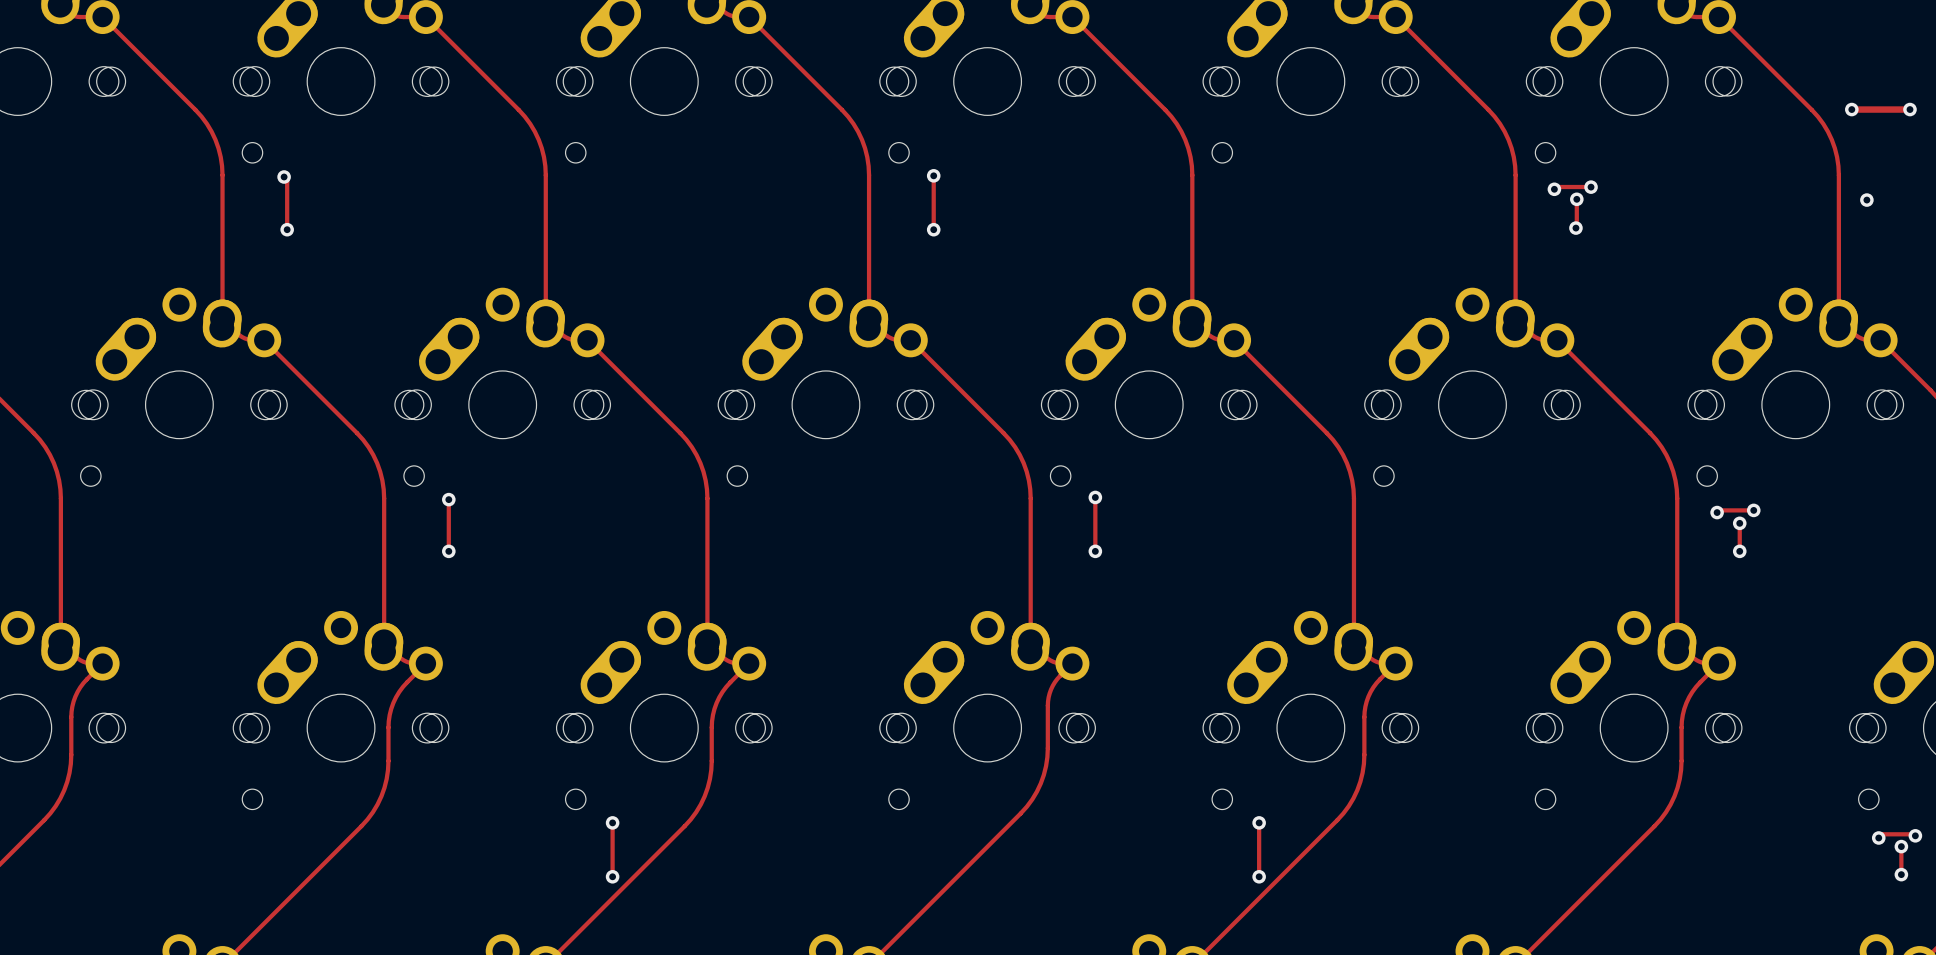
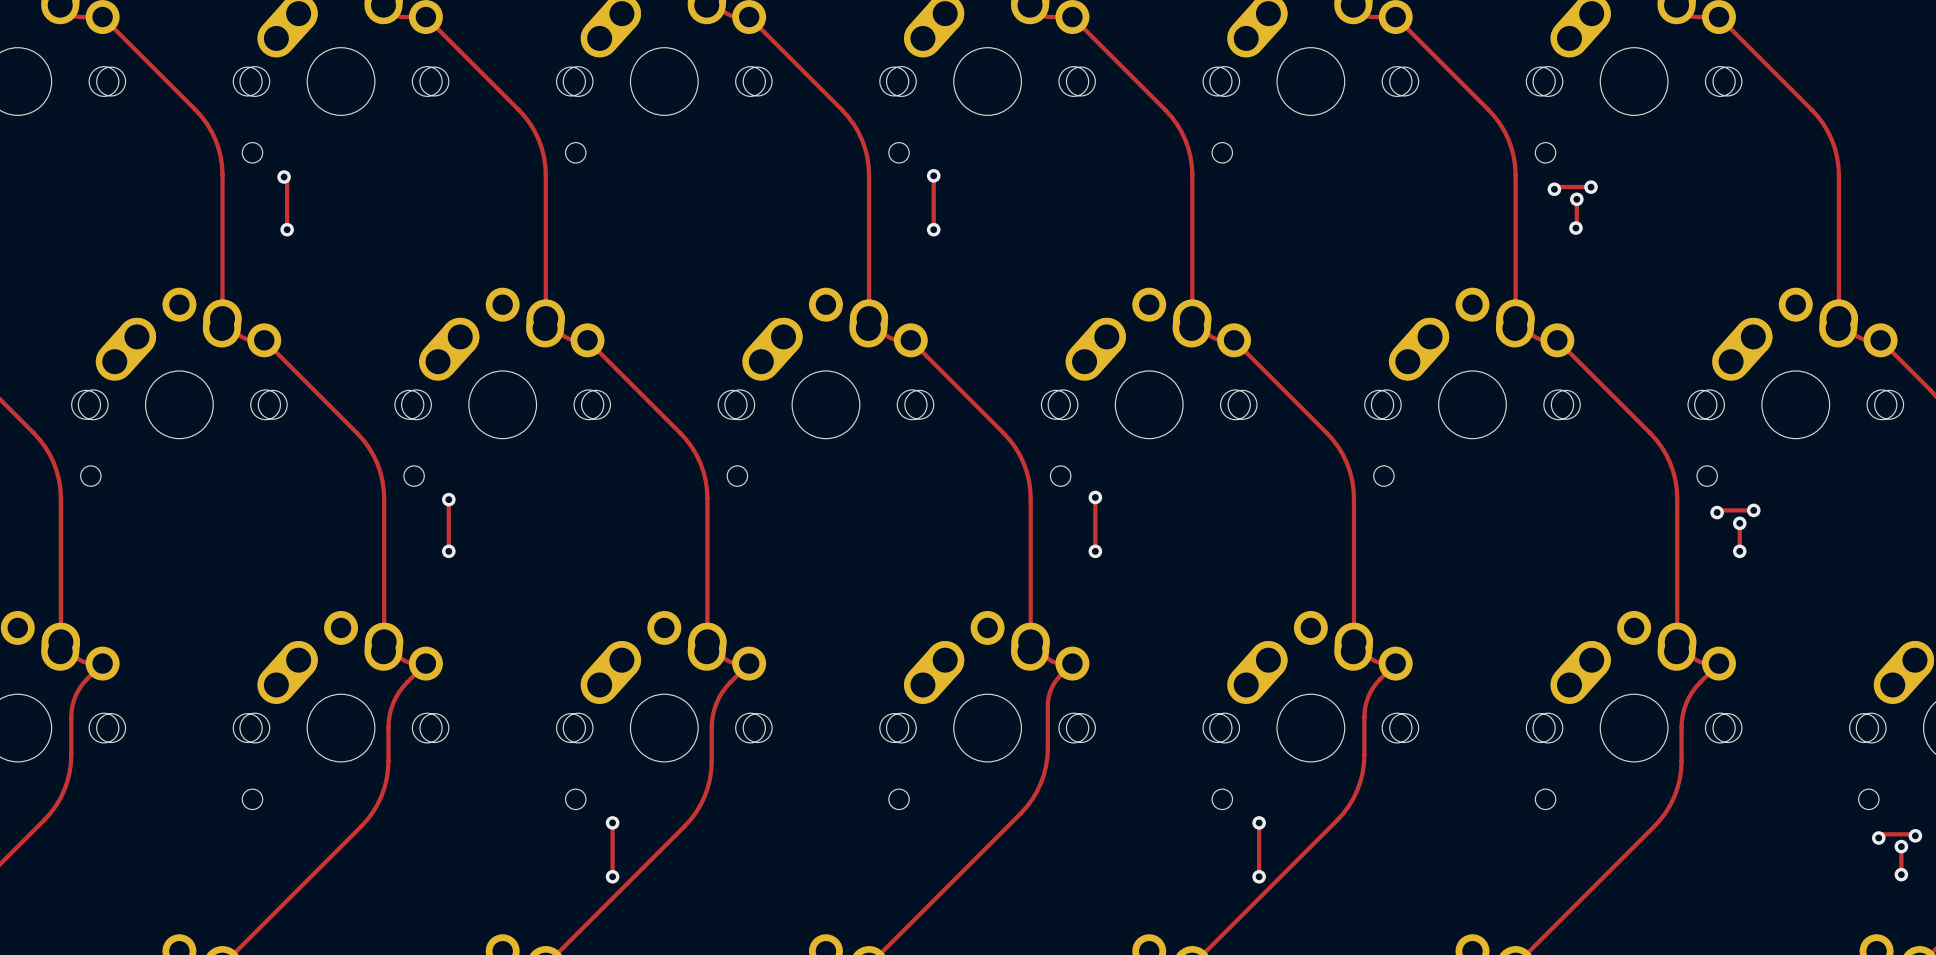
track: (1851, 109) (1909, 109) -> none
via: (1851, 109) -> none
via: (1909, 109) -> none
via: (1866, 200) -> none

